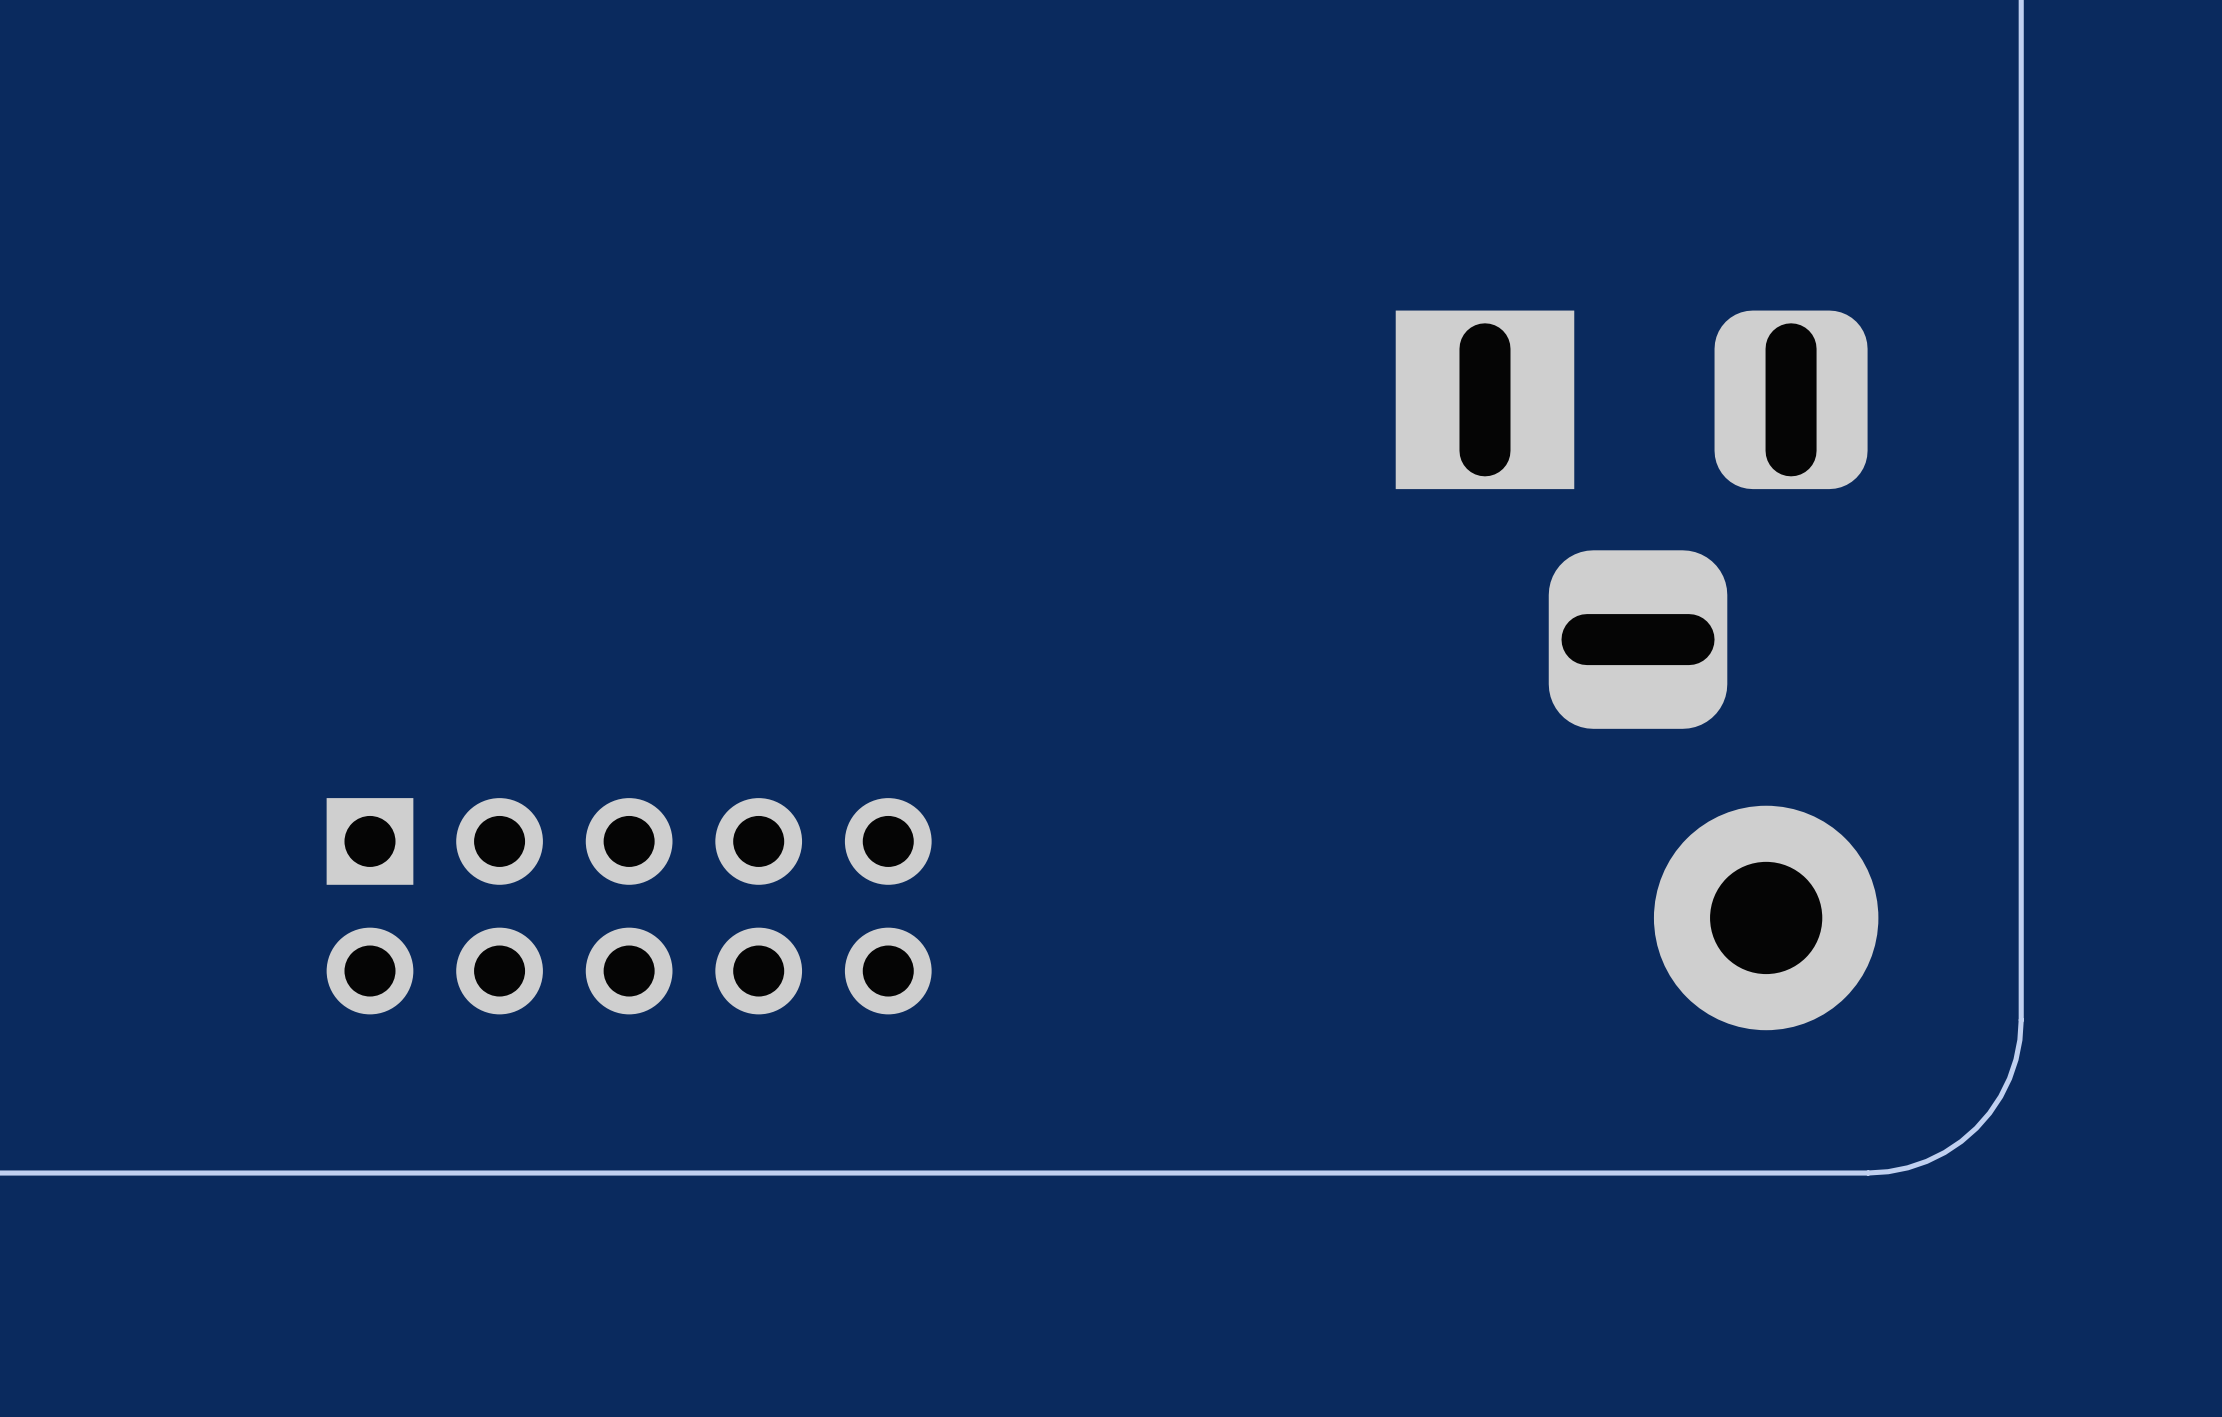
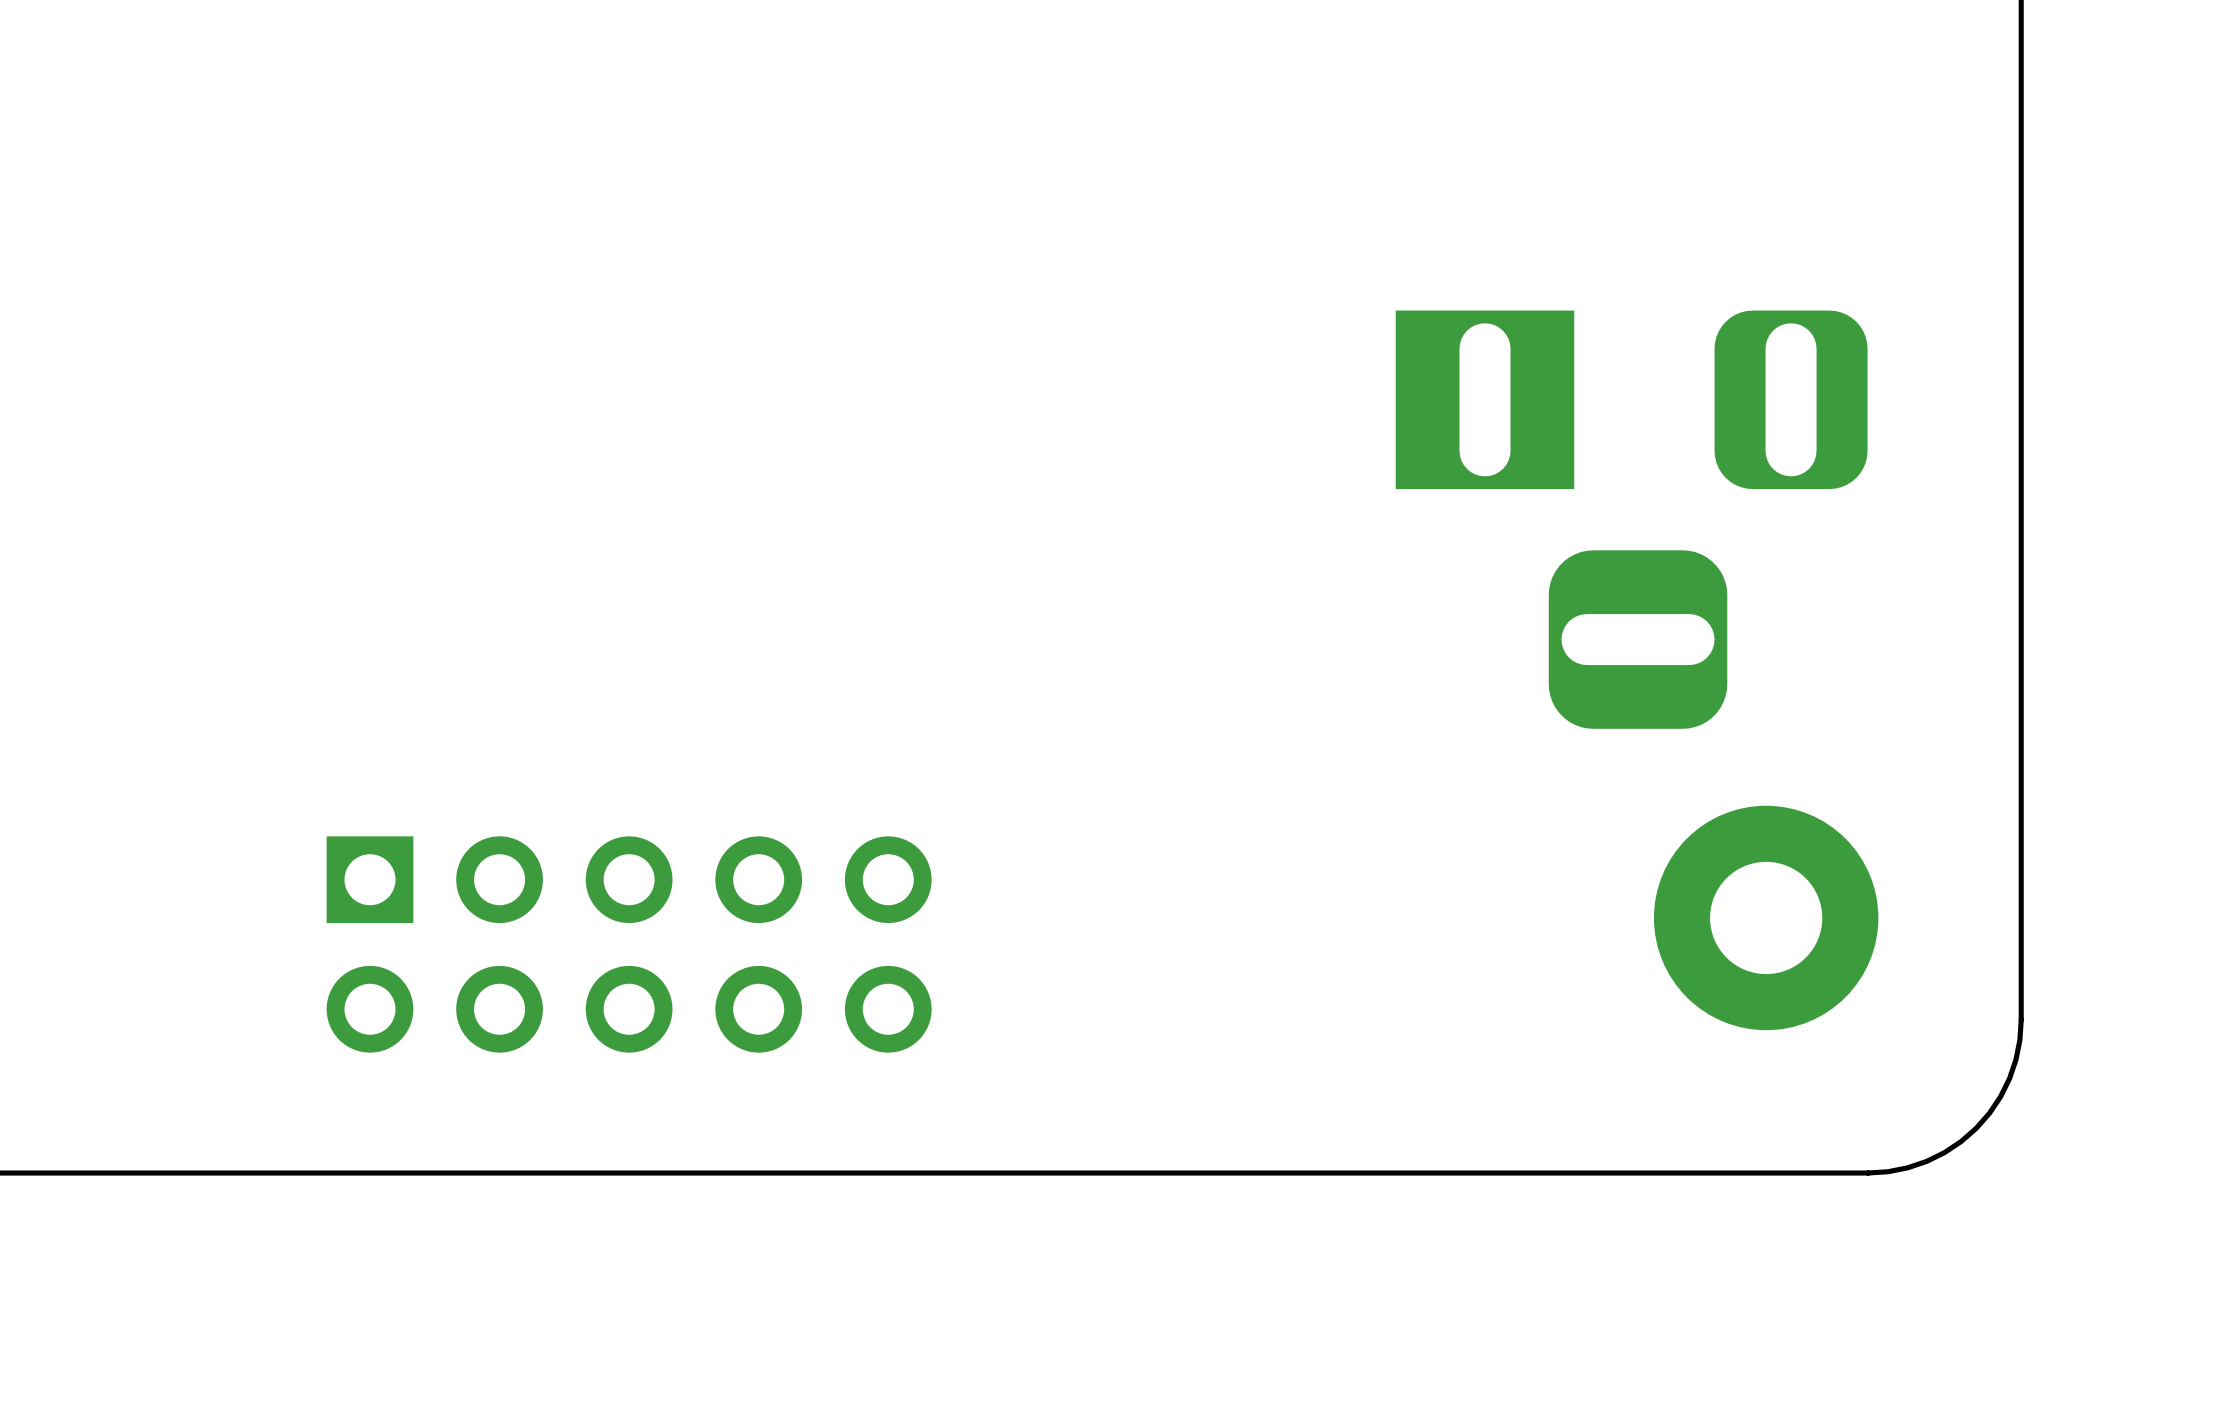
part position: (629, 906) -> (629, 944)

